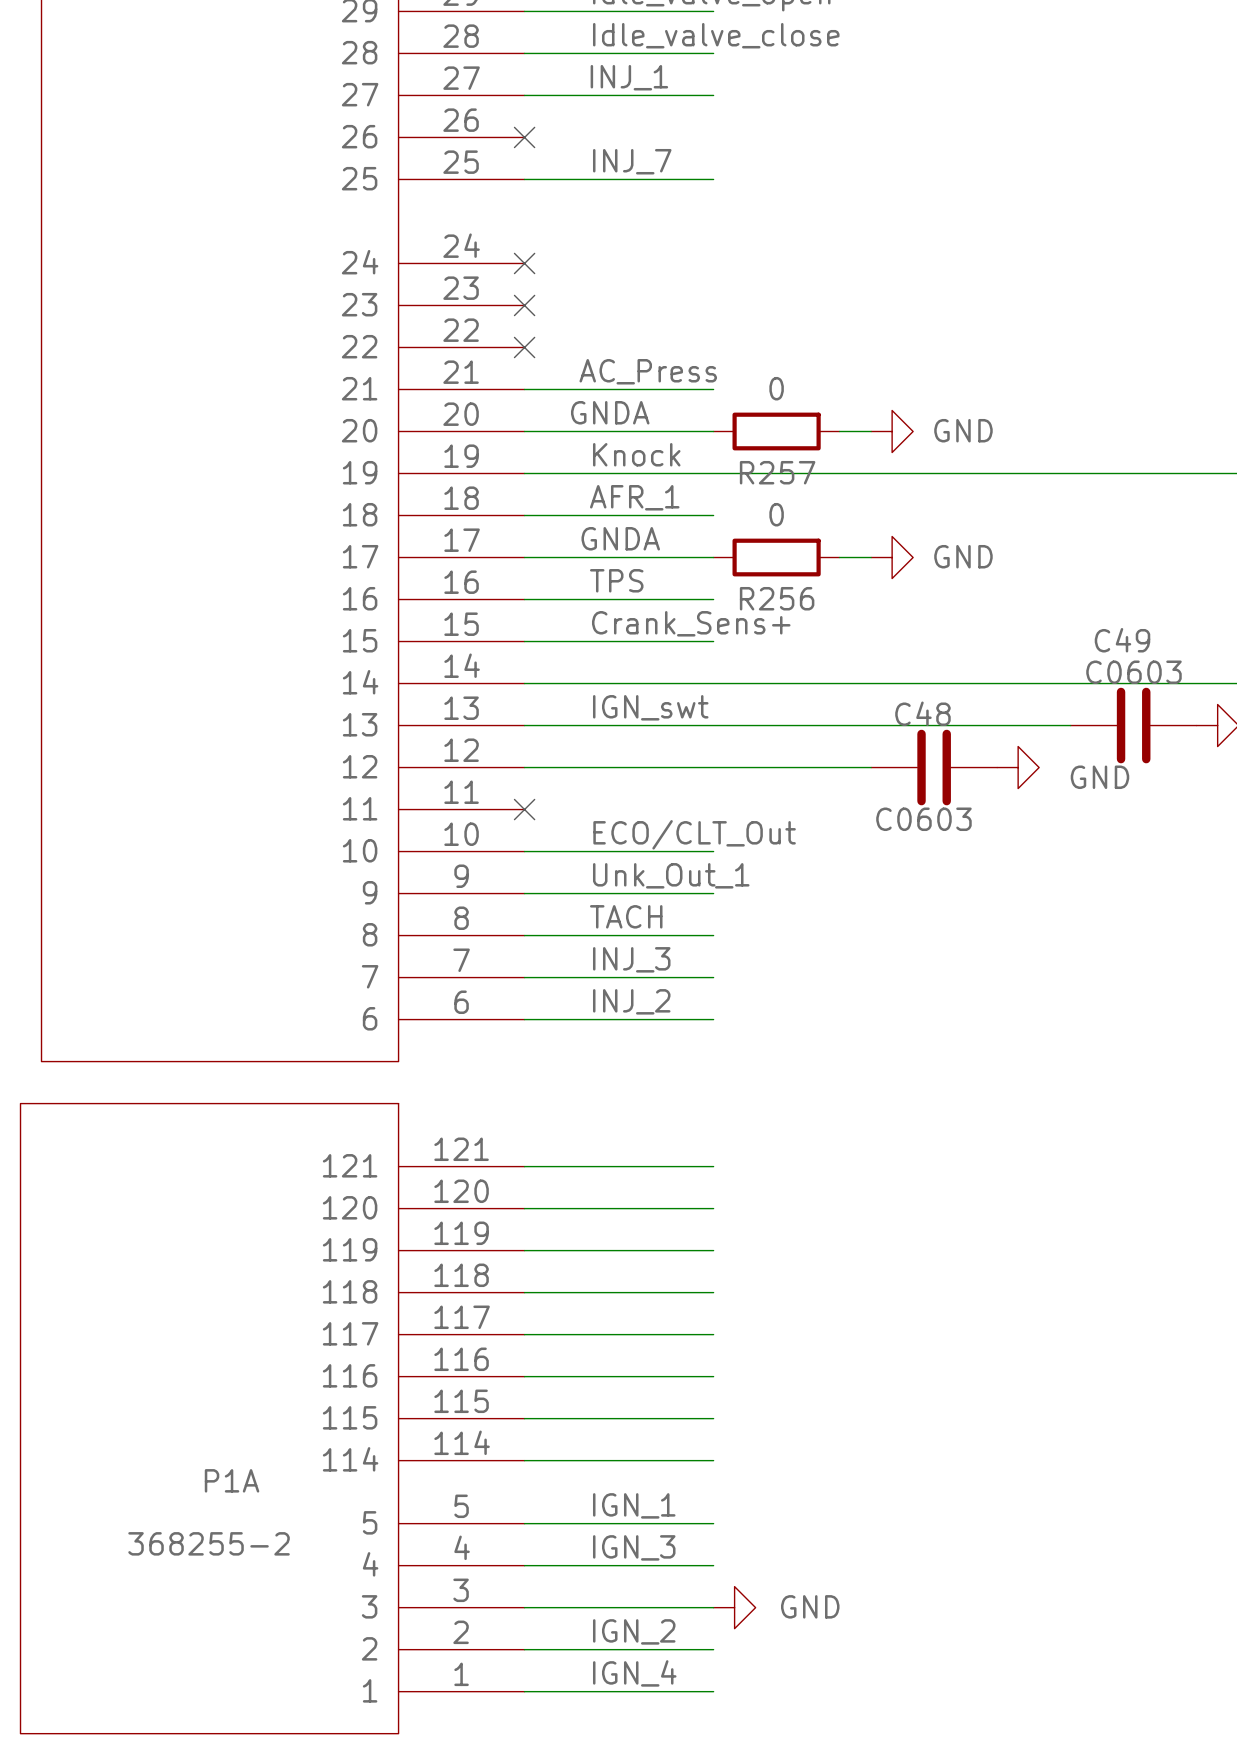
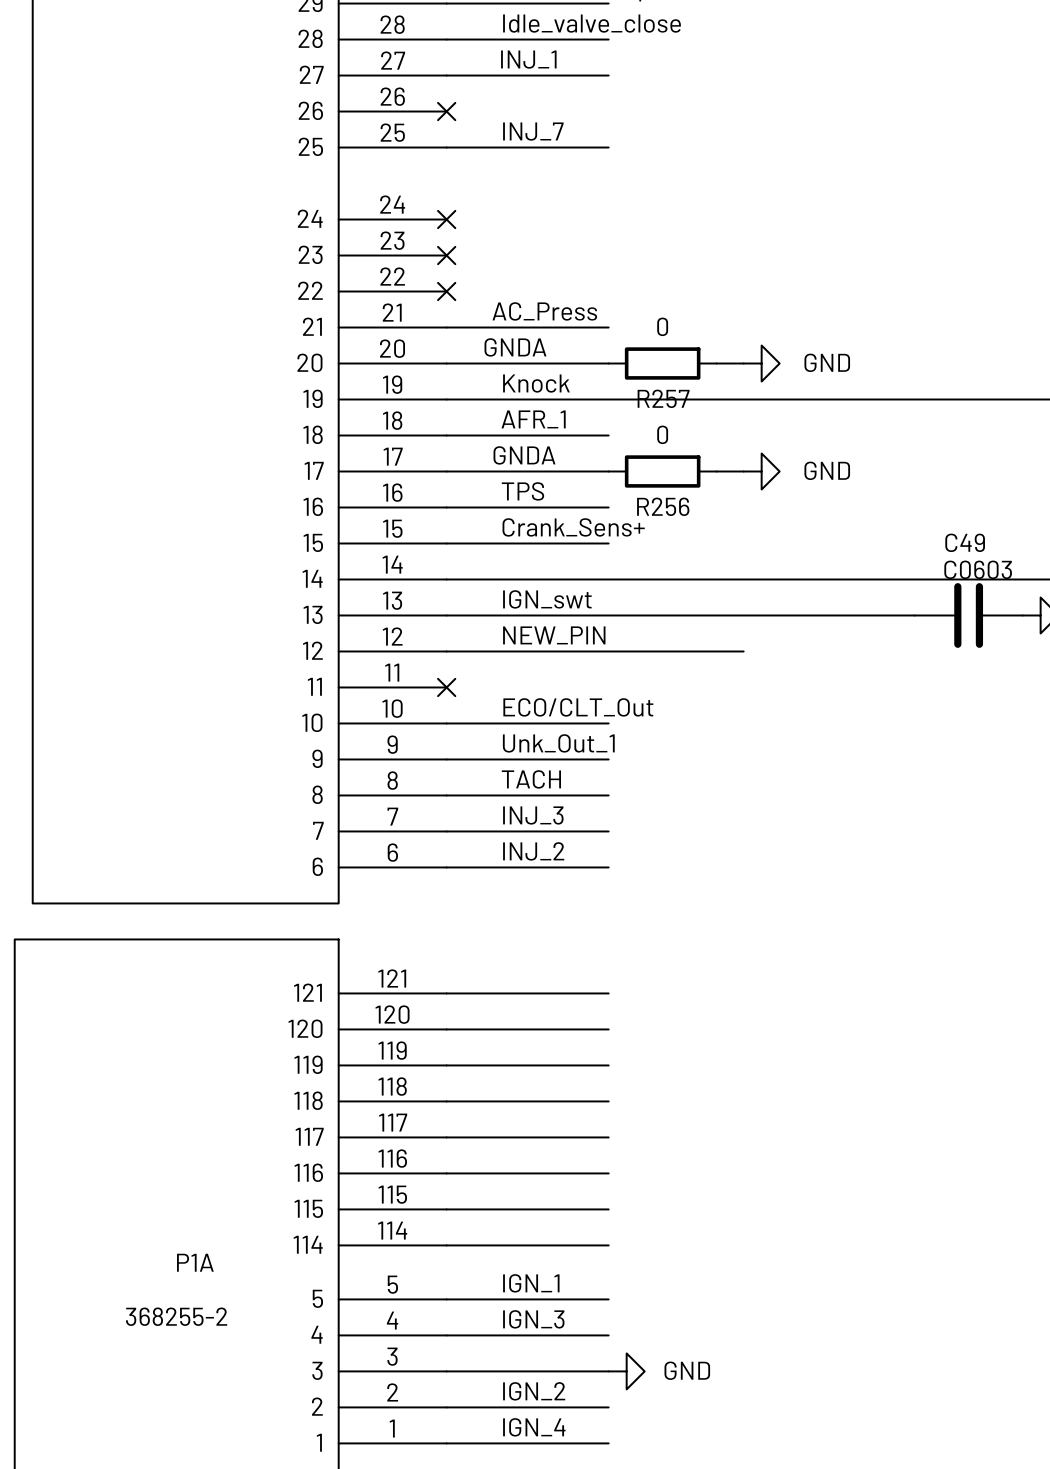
label: none -> NEW_PIN (554, 635)
C48: C0603 (934, 767) -> none
power symbol: GND (1018, 767) -> none

